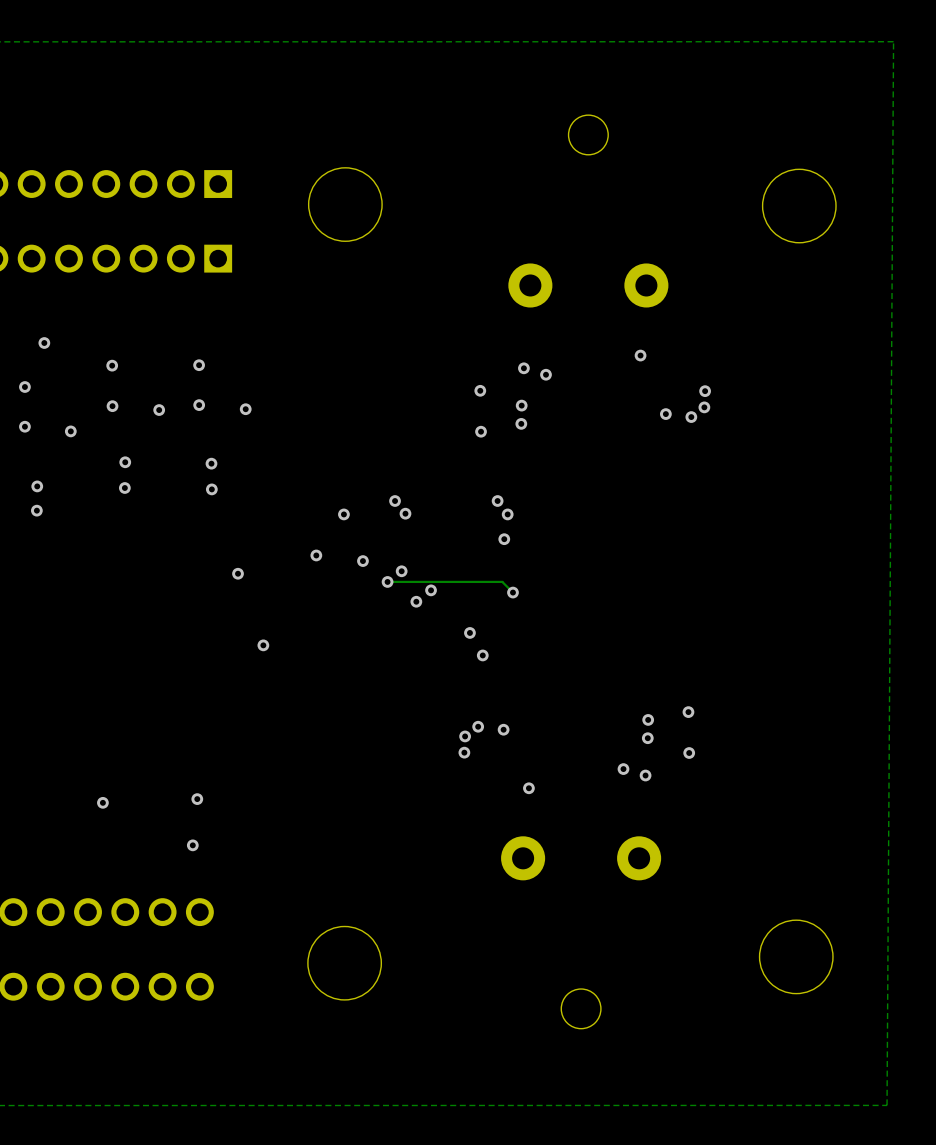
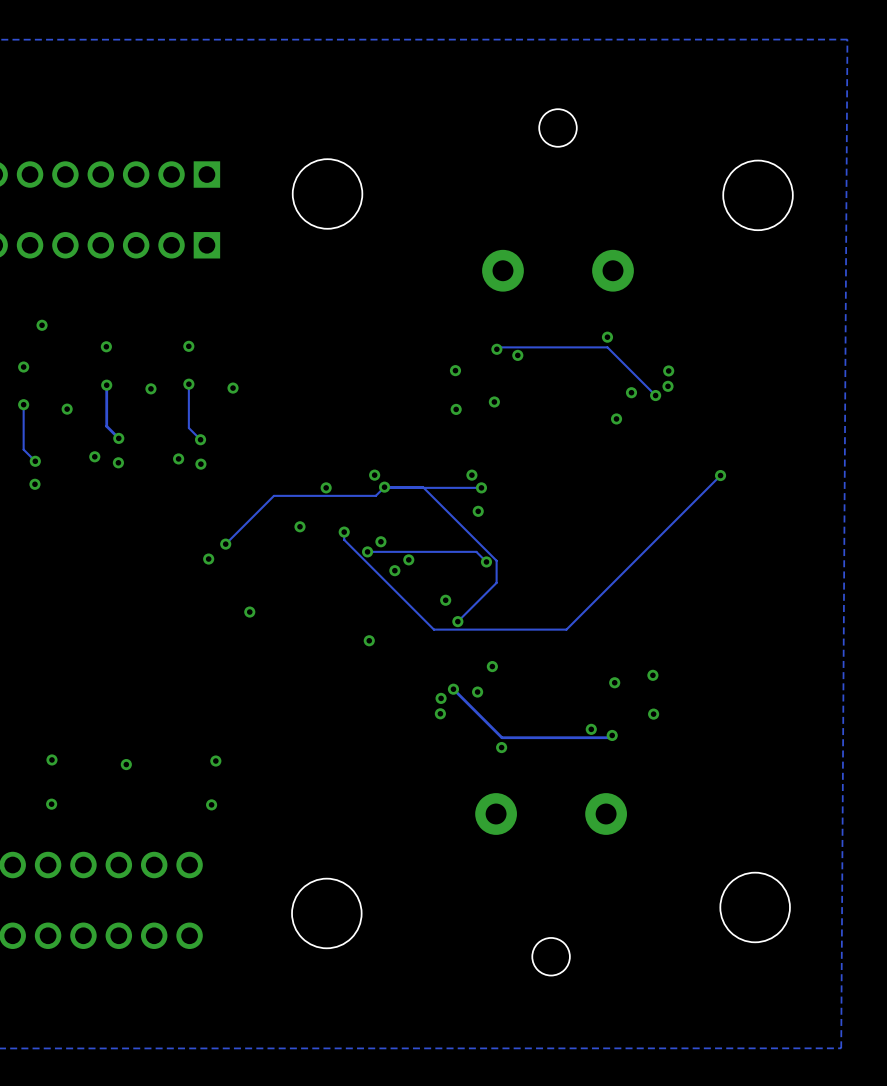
track: none -> (496, 349) (498, 347) (607, 347) (655, 395)
track: none -> (188, 384) (188, 428) (200, 439)
via: (521, 405) -> none
track: none -> (106, 385) (106, 426) (118, 438)
track: none -> (23, 404) (23, 449) (35, 461)
via: none -> (616, 418)
via: none -> (94, 456)
via: none -> (178, 458)
track: none -> (720, 475) (566, 629) (433, 629) (344, 539) (344, 532)
via: none -> (720, 475)
track: none -> (384, 487) (481, 487)
track: none -> (384, 487) (423, 487) (496, 560) (496, 582) (457, 621)
track: none -> (384, 487) (375, 495) (273, 495) (225, 544)
via: none -> (208, 559)
via: none -> (369, 640)
via: none -> (492, 666)
track: none -> (453, 689) (501, 737) (609, 737) (612, 735)
via: (647, 738) -> none
via: (197, 799) -> none
via: none -> (51, 759)
via: (102, 802) -> none
via: none -> (215, 761)
via: none -> (126, 764)
via: (192, 845) -> none
via: none -> (51, 804)
via: none -> (211, 804)

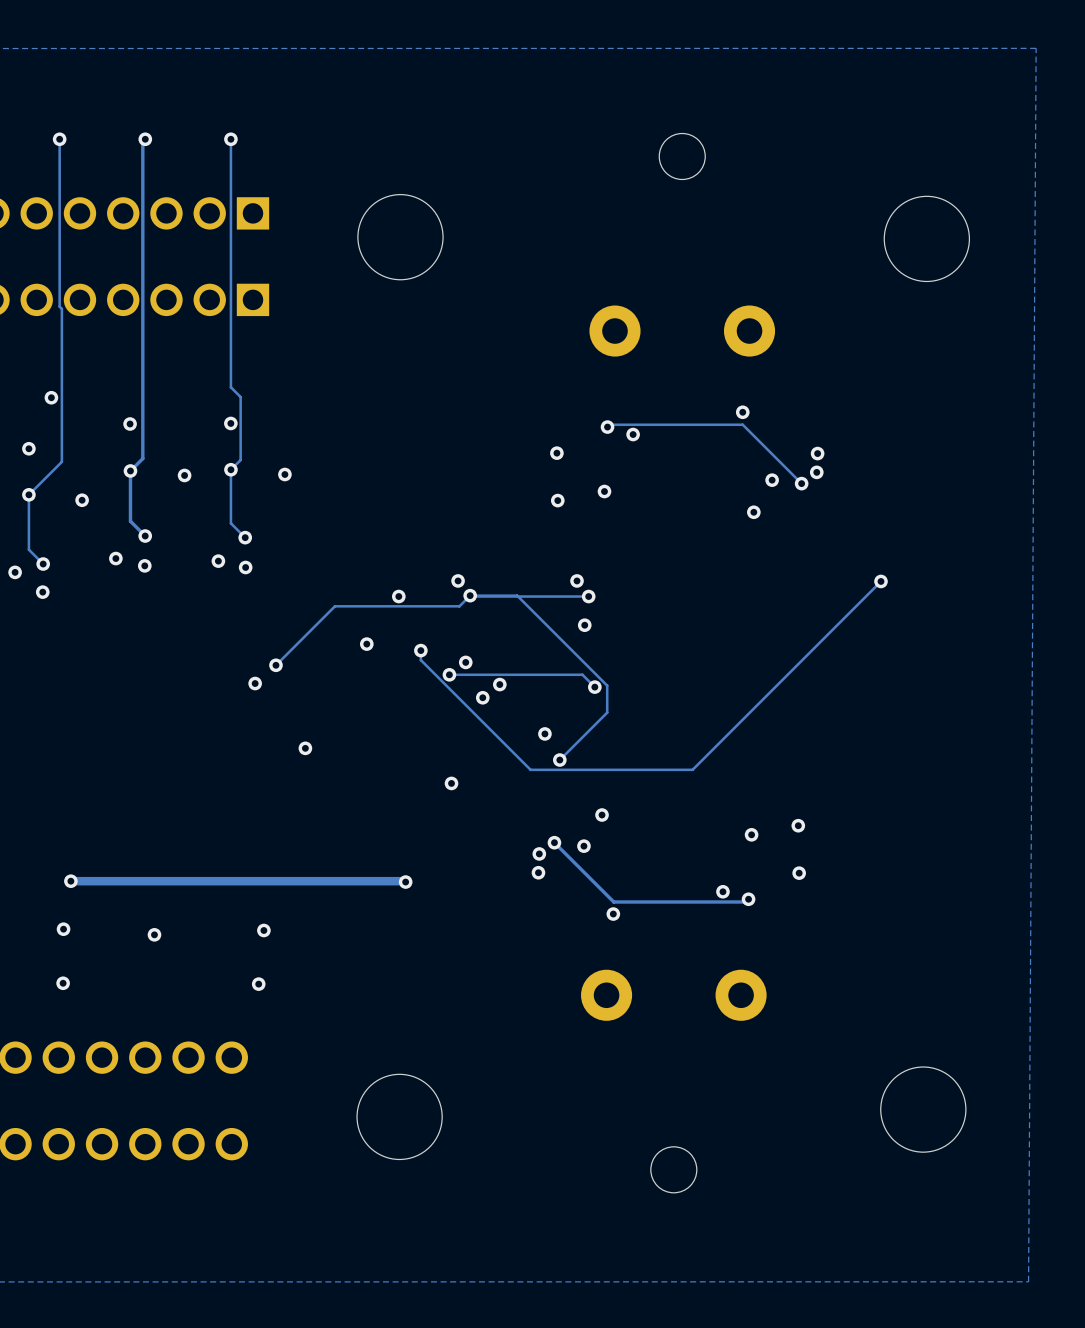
track: none -> (59, 139) (61, 461) (28, 494)
via: none -> (59, 139)
track: none -> (145, 139) (142, 141) (142, 458) (130, 470)
via: none -> (145, 139)
track: none -> (230, 139) (230, 387) (240, 397) (240, 460) (230, 469)
via: none -> (230, 139)
via: none -> (15, 572)
track: none -> (70, 881) (405, 882)
via: none -> (70, 881)
via: none -> (405, 882)

